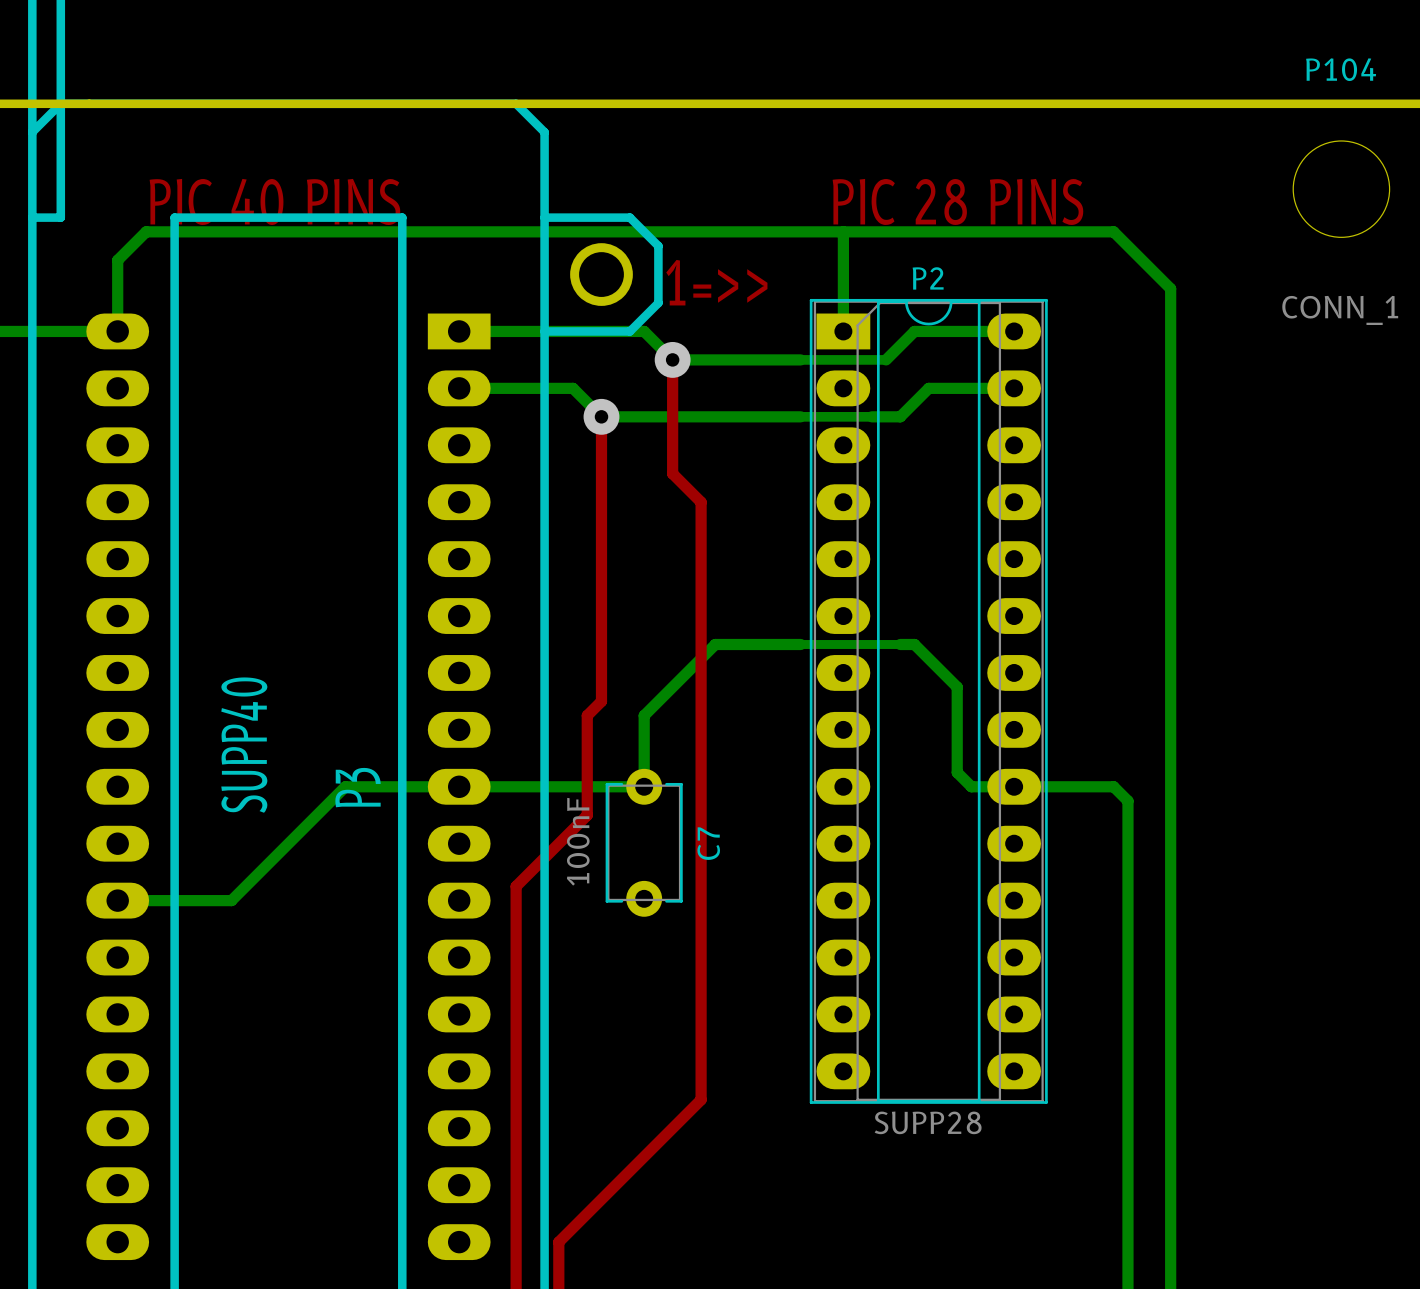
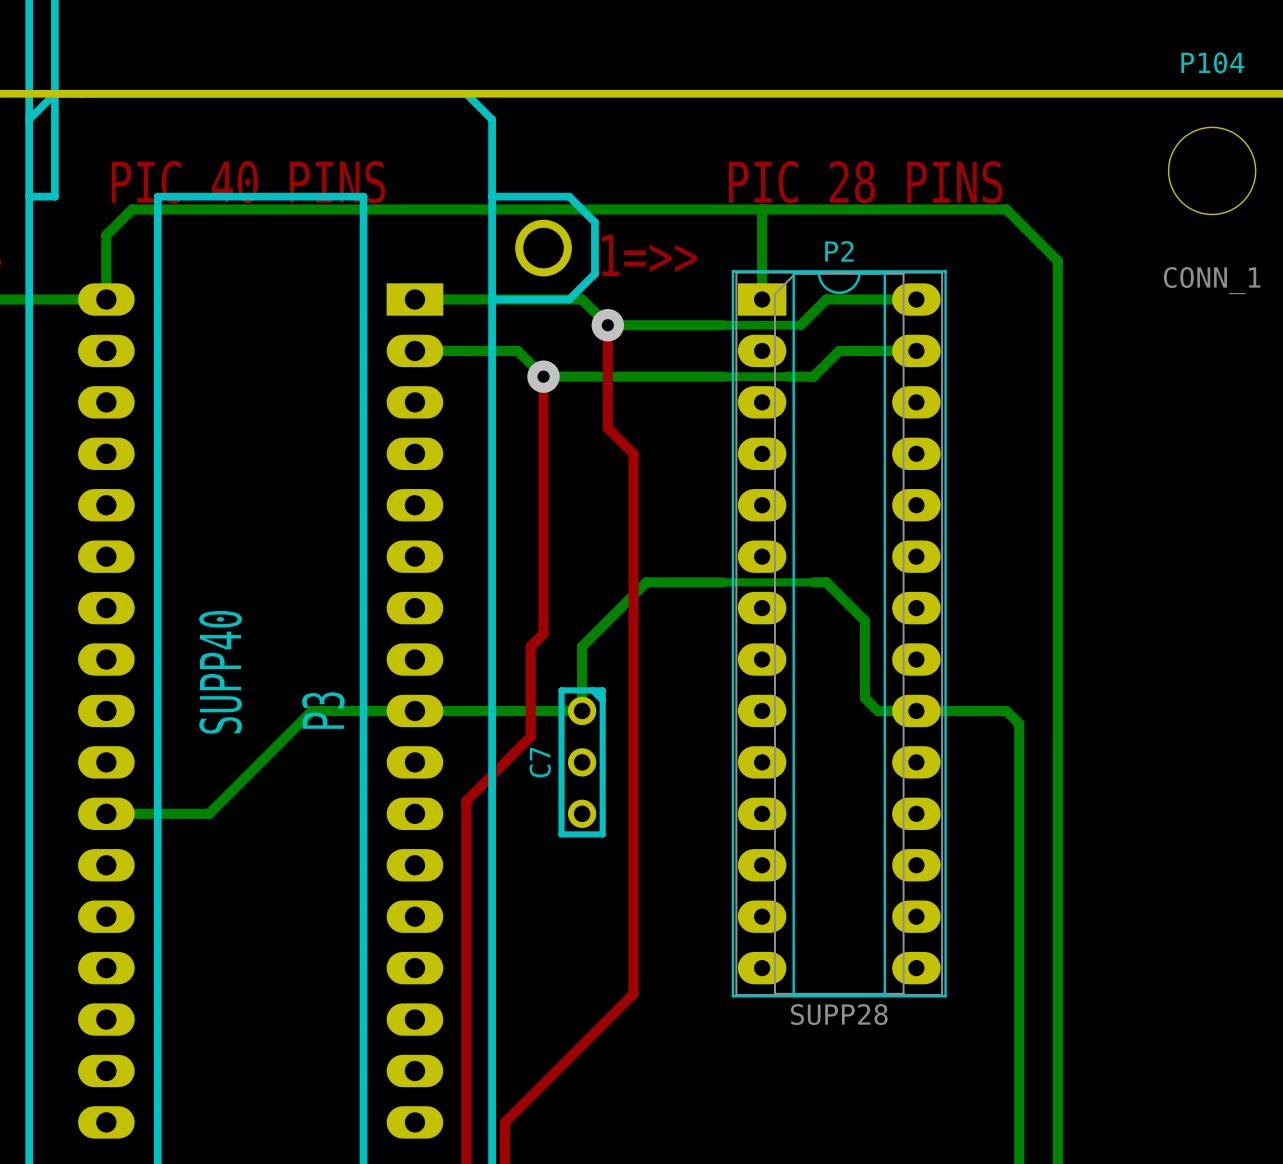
C7 footprint: [605, 768, 683, 917] -> [558, 687, 606, 838]
C7 value: 100nF (578, 841) -> none
C7 name position: C7 (708, 843) -> C7 (540, 762)

